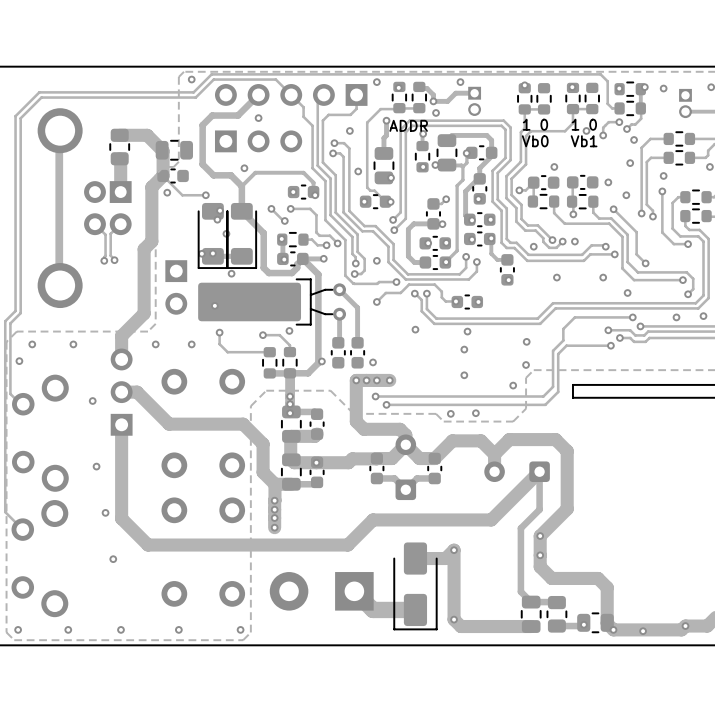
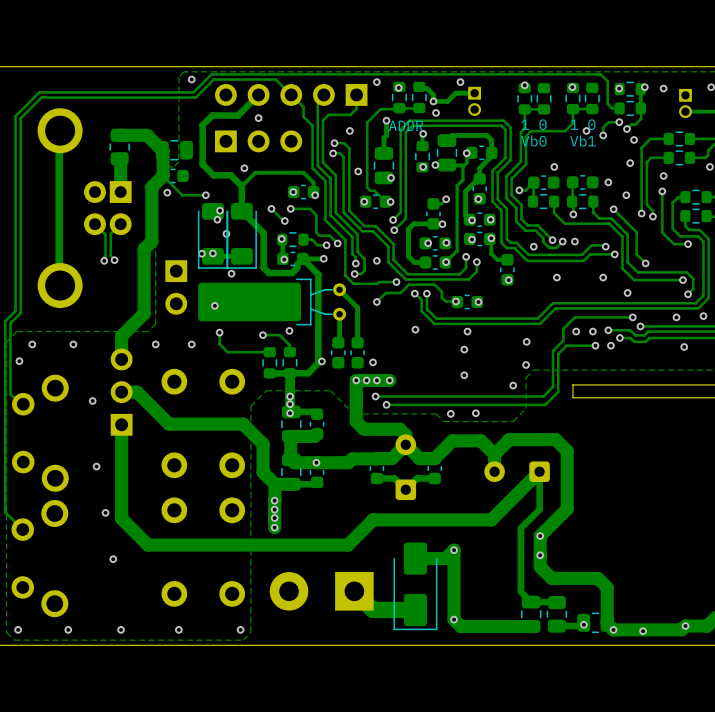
via: none -> (576, 331)
via: none -> (592, 331)
via: none -> (595, 345)
track: (610, 345) (595, 345) -> none
via: none -> (684, 346)

